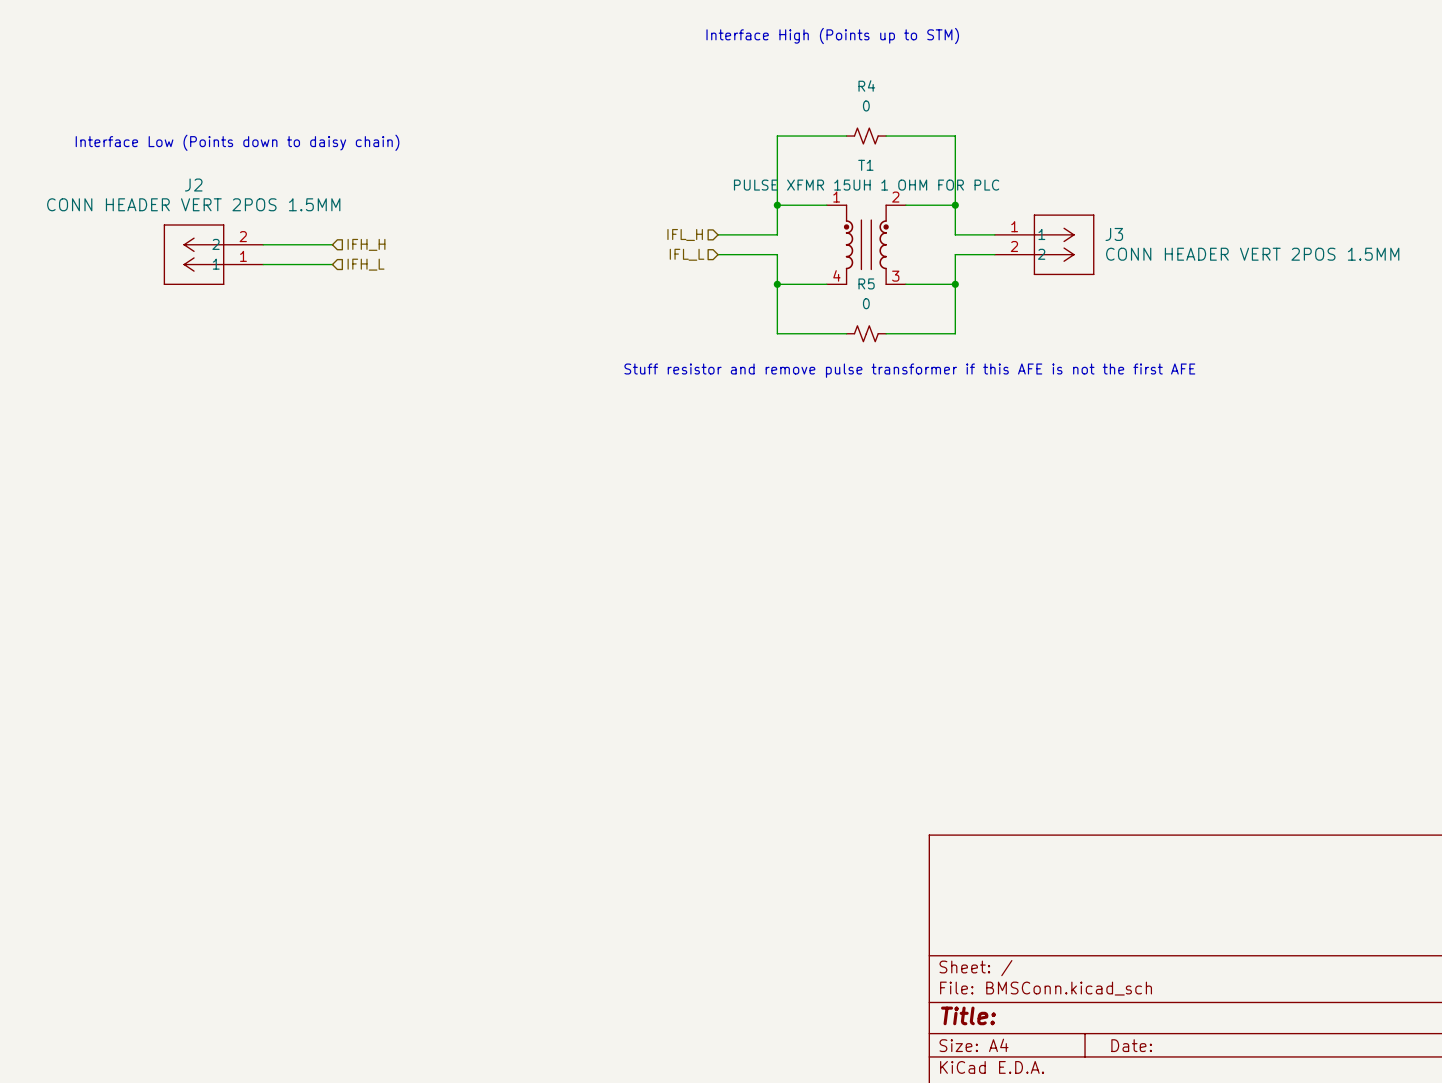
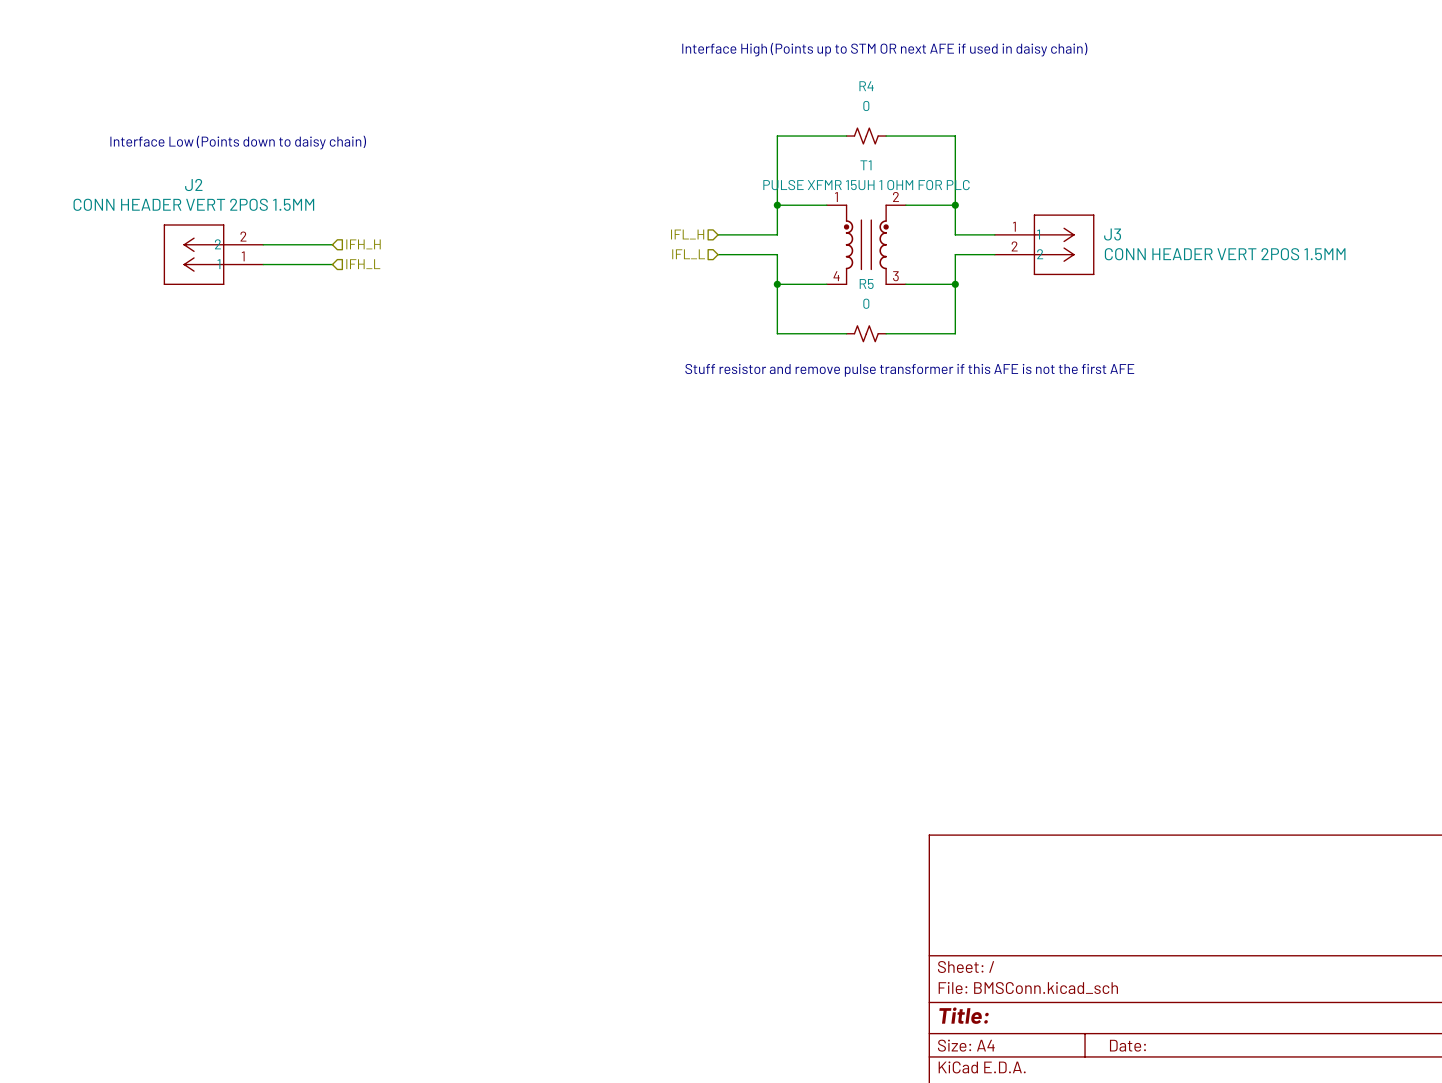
text: Interface High (Points up to STM) (832, 36) -> Interface High (Points up to STM OR next AFE if used in daisy chain) (884, 49)

